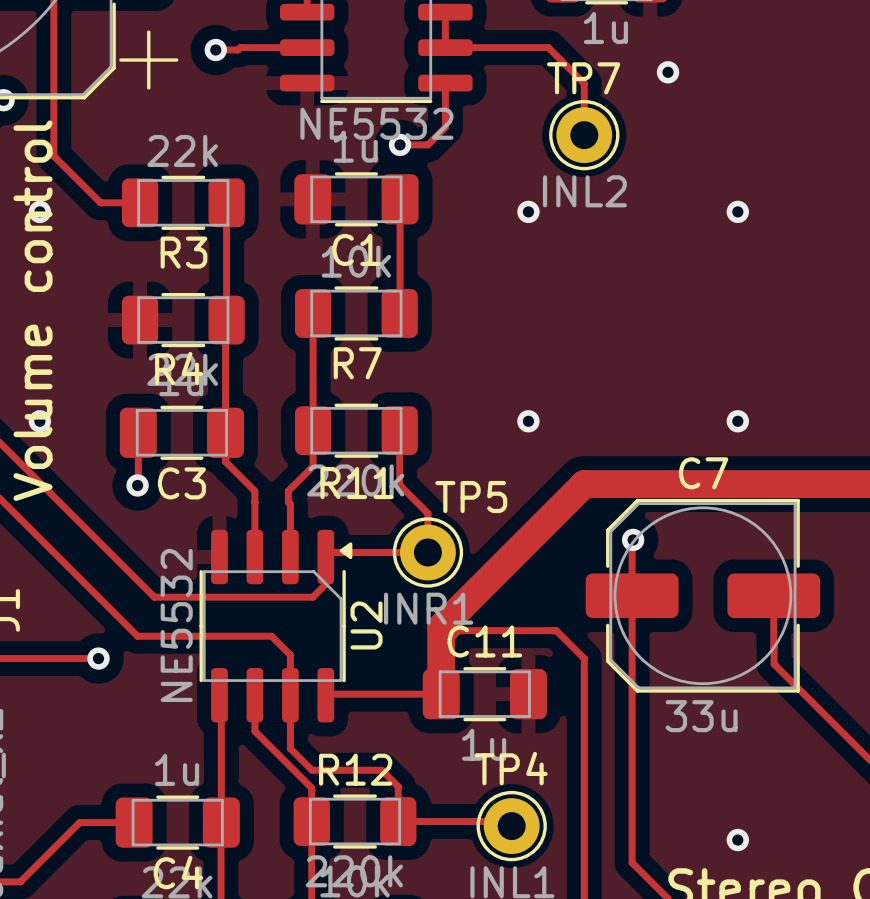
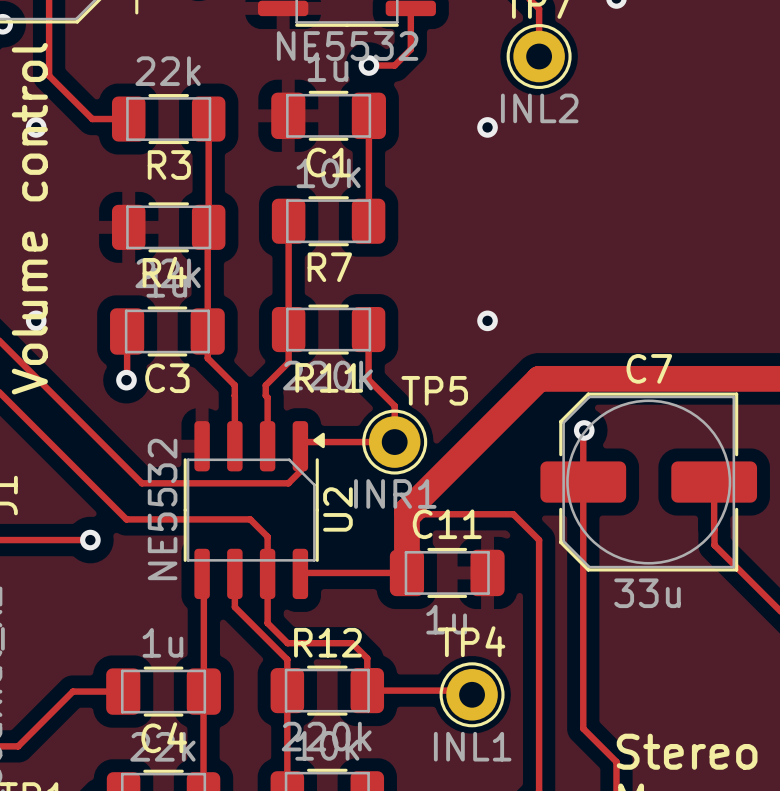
via: (737, 211) -> none
via: (737, 421) -> none
via: (737, 840) -> none

